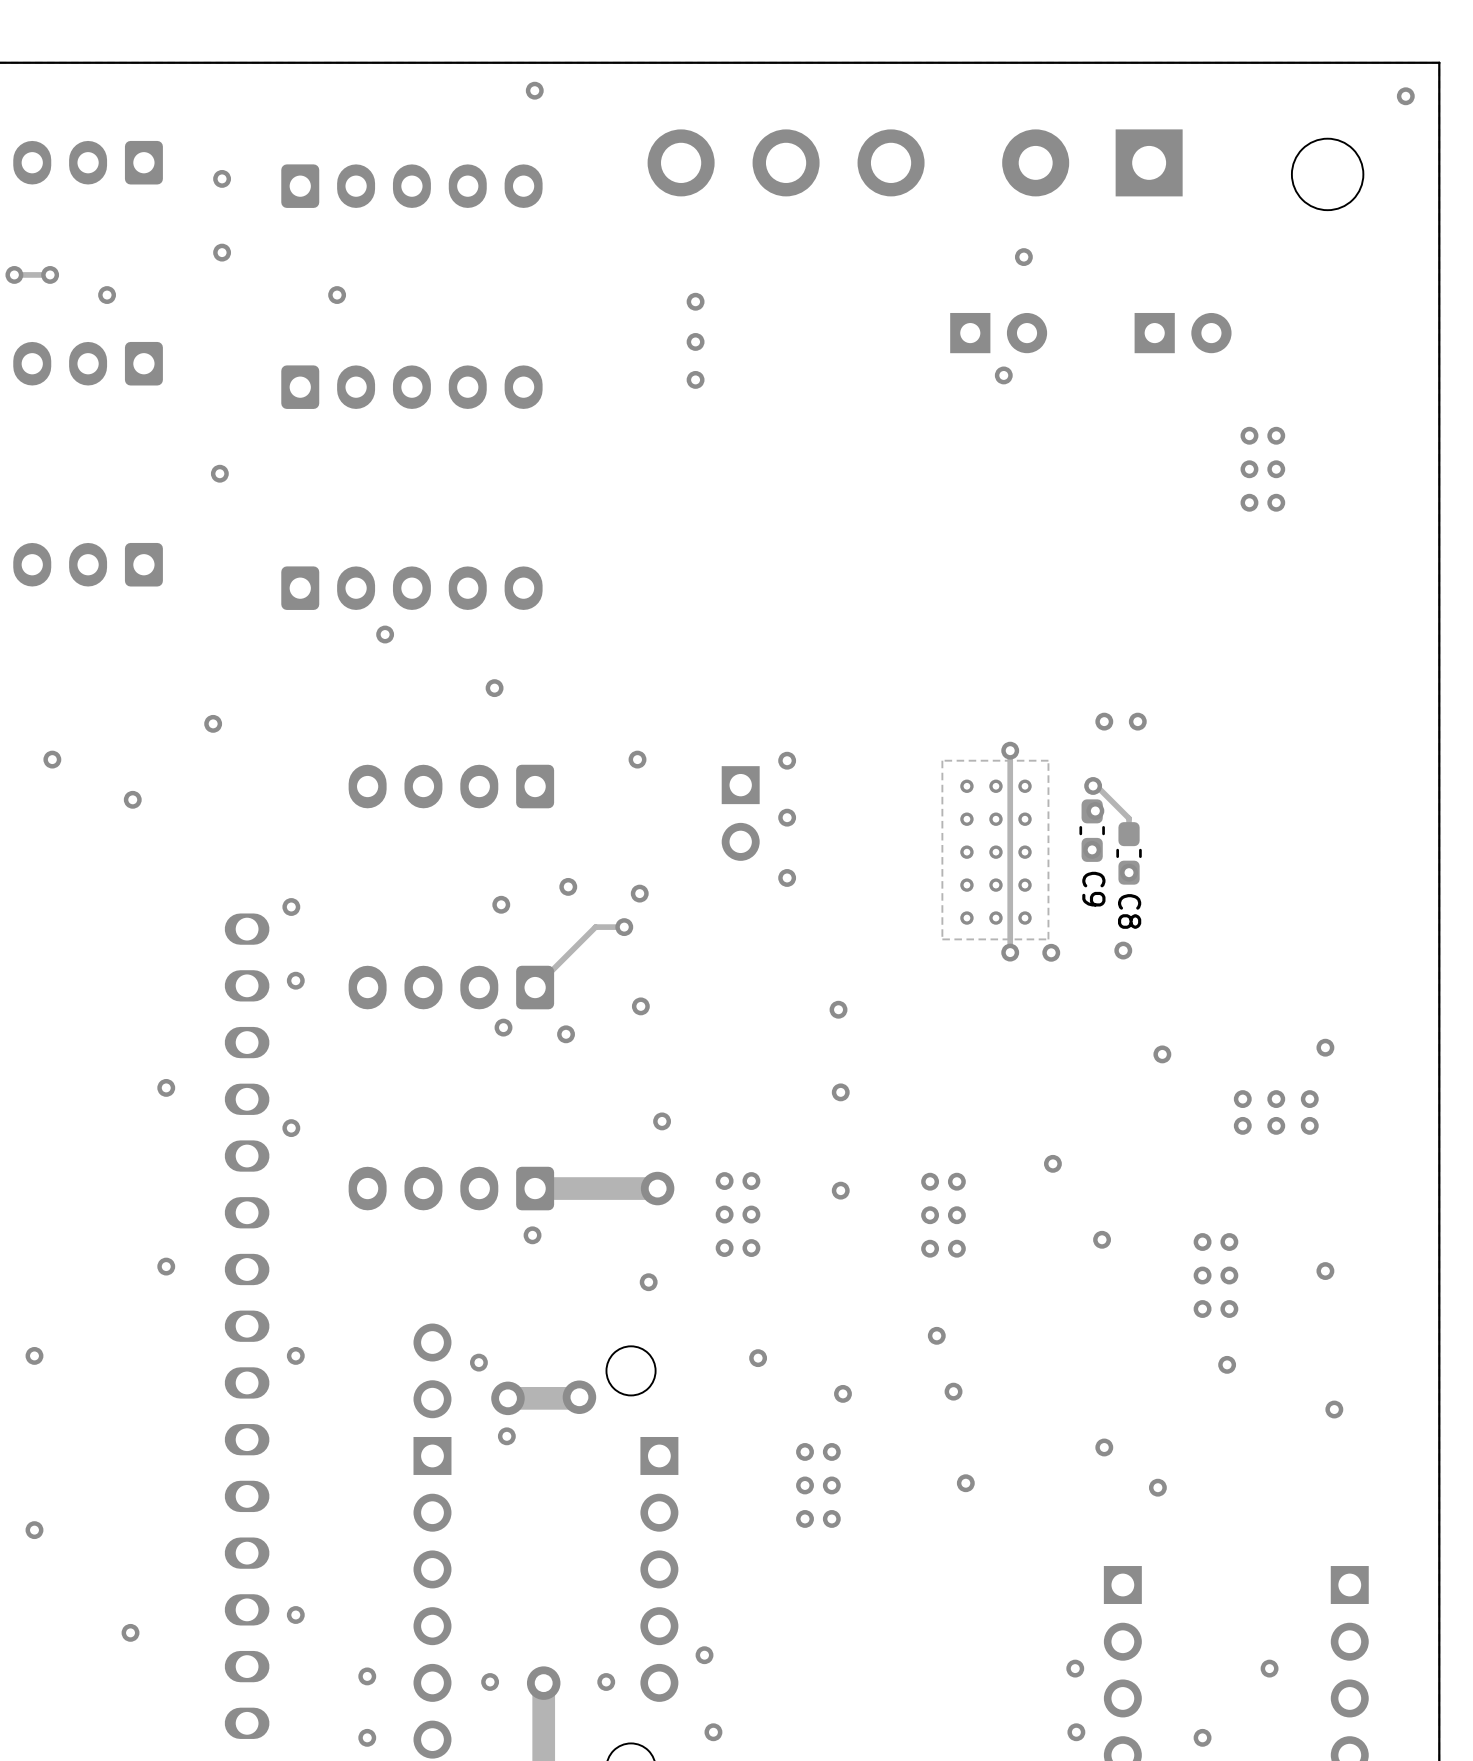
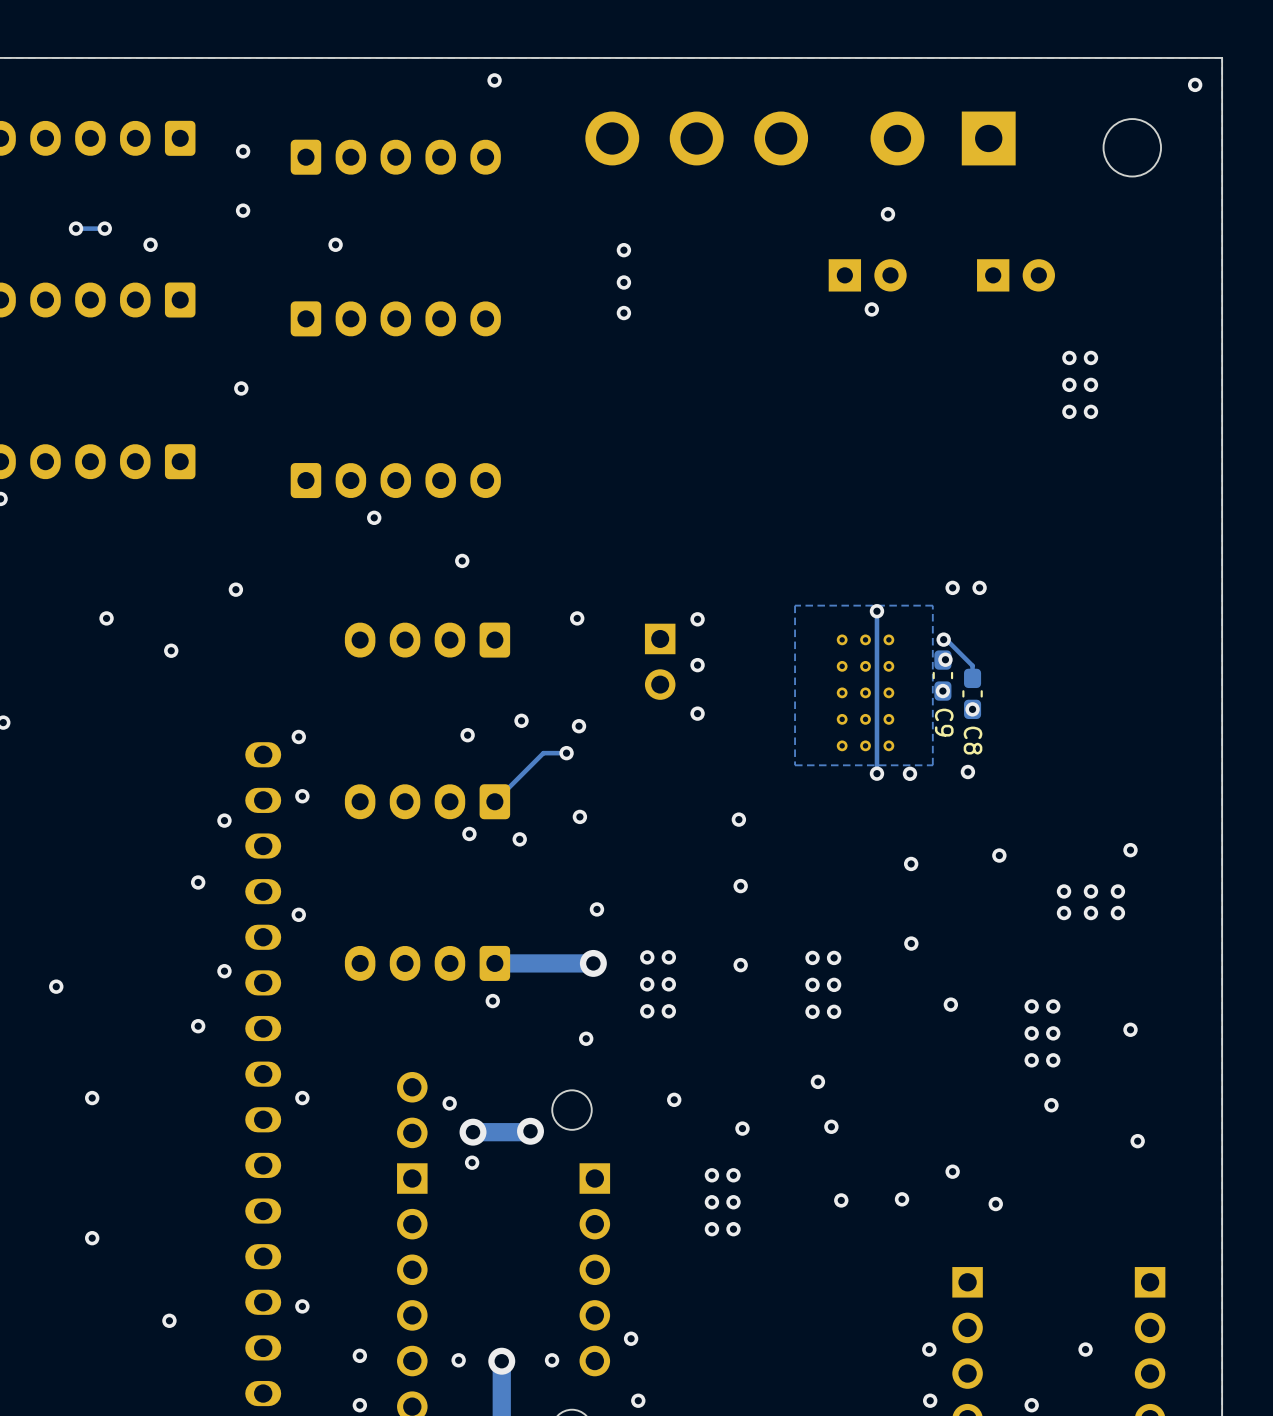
zone outline: (1048, 760) (1048, 939) (942, 939) (942, 760) (1048, 760) -> (932, 605) (932, 765) (795, 765) (795, 605) (932, 605)
via: none -> (224, 820)
via: none -> (911, 863)
via: none -> (224, 971)
via: none -> (902, 1199)

